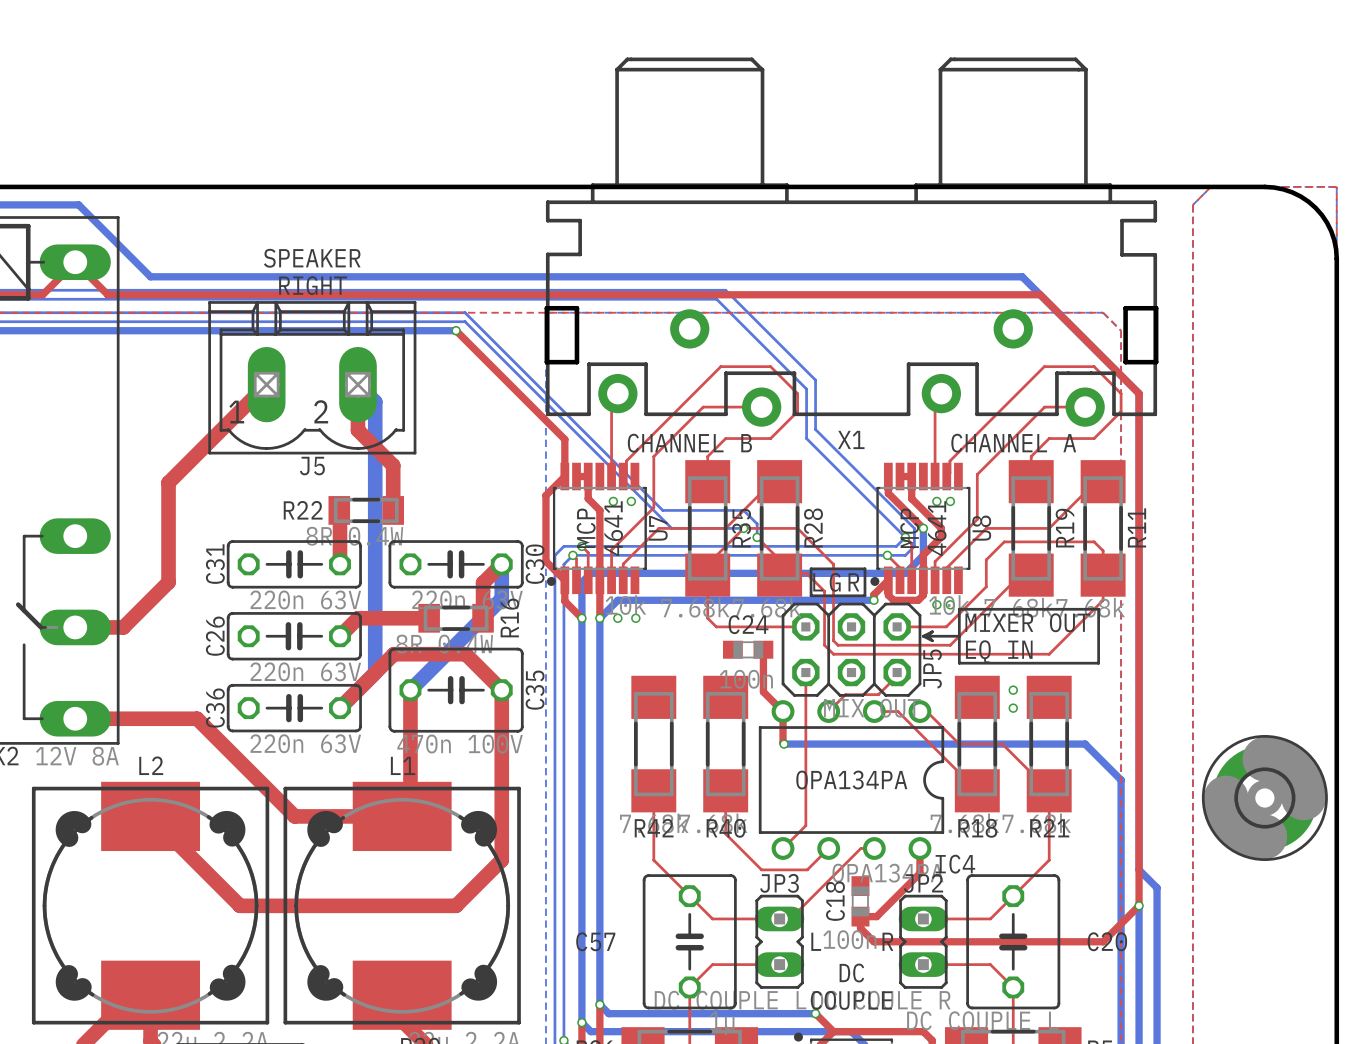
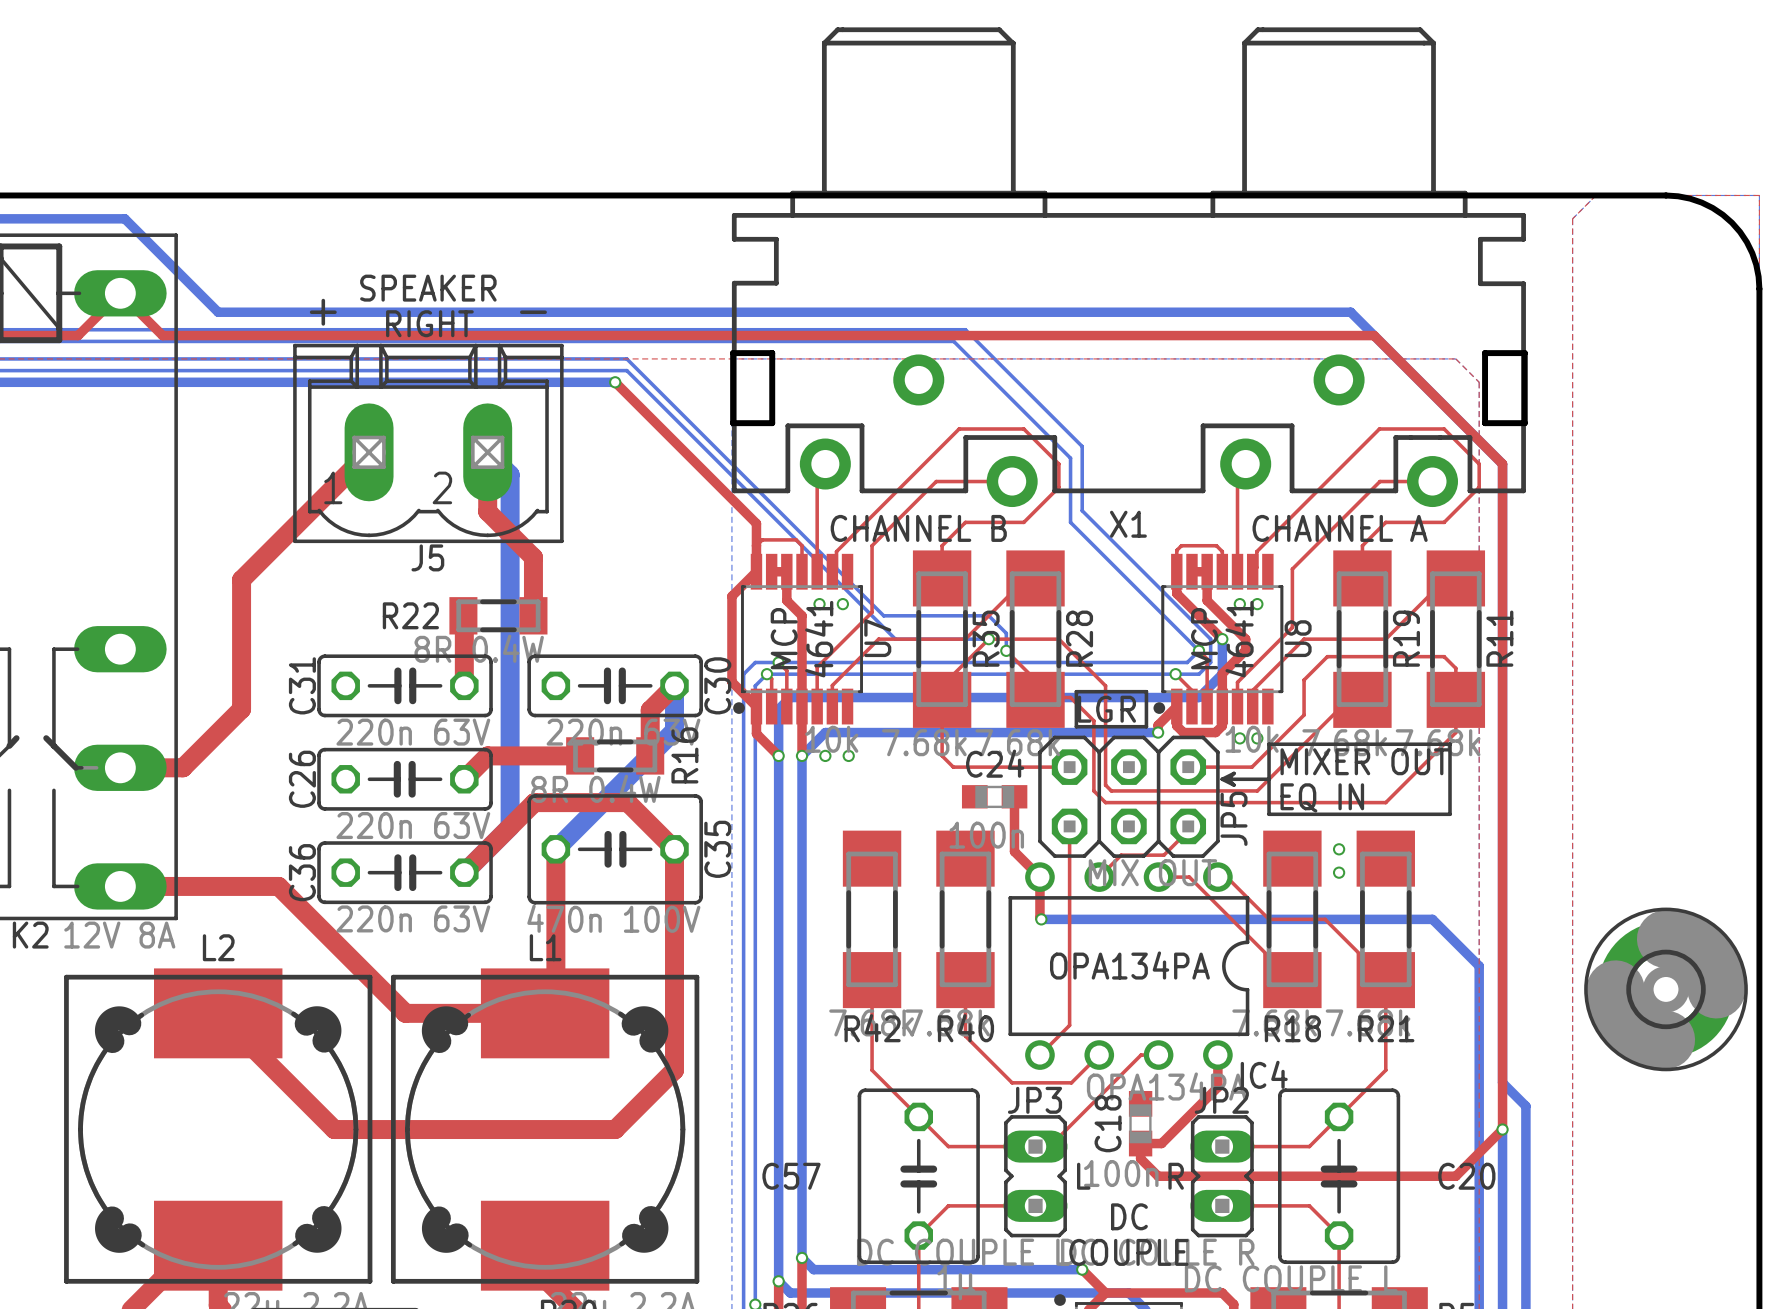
line: none -> (323, 300) (323, 323)
line: none -> (311, 312) (334, 312)
line: none -> (521, 312) (545, 312)
top track: none -> (756, 545) (762, 539) (796, 539) (802, 545) (802, 571)
top track: none -> (1176, 571) (1176, 550) (1181, 545) (1216, 545) (1222, 551) (1222, 571)

